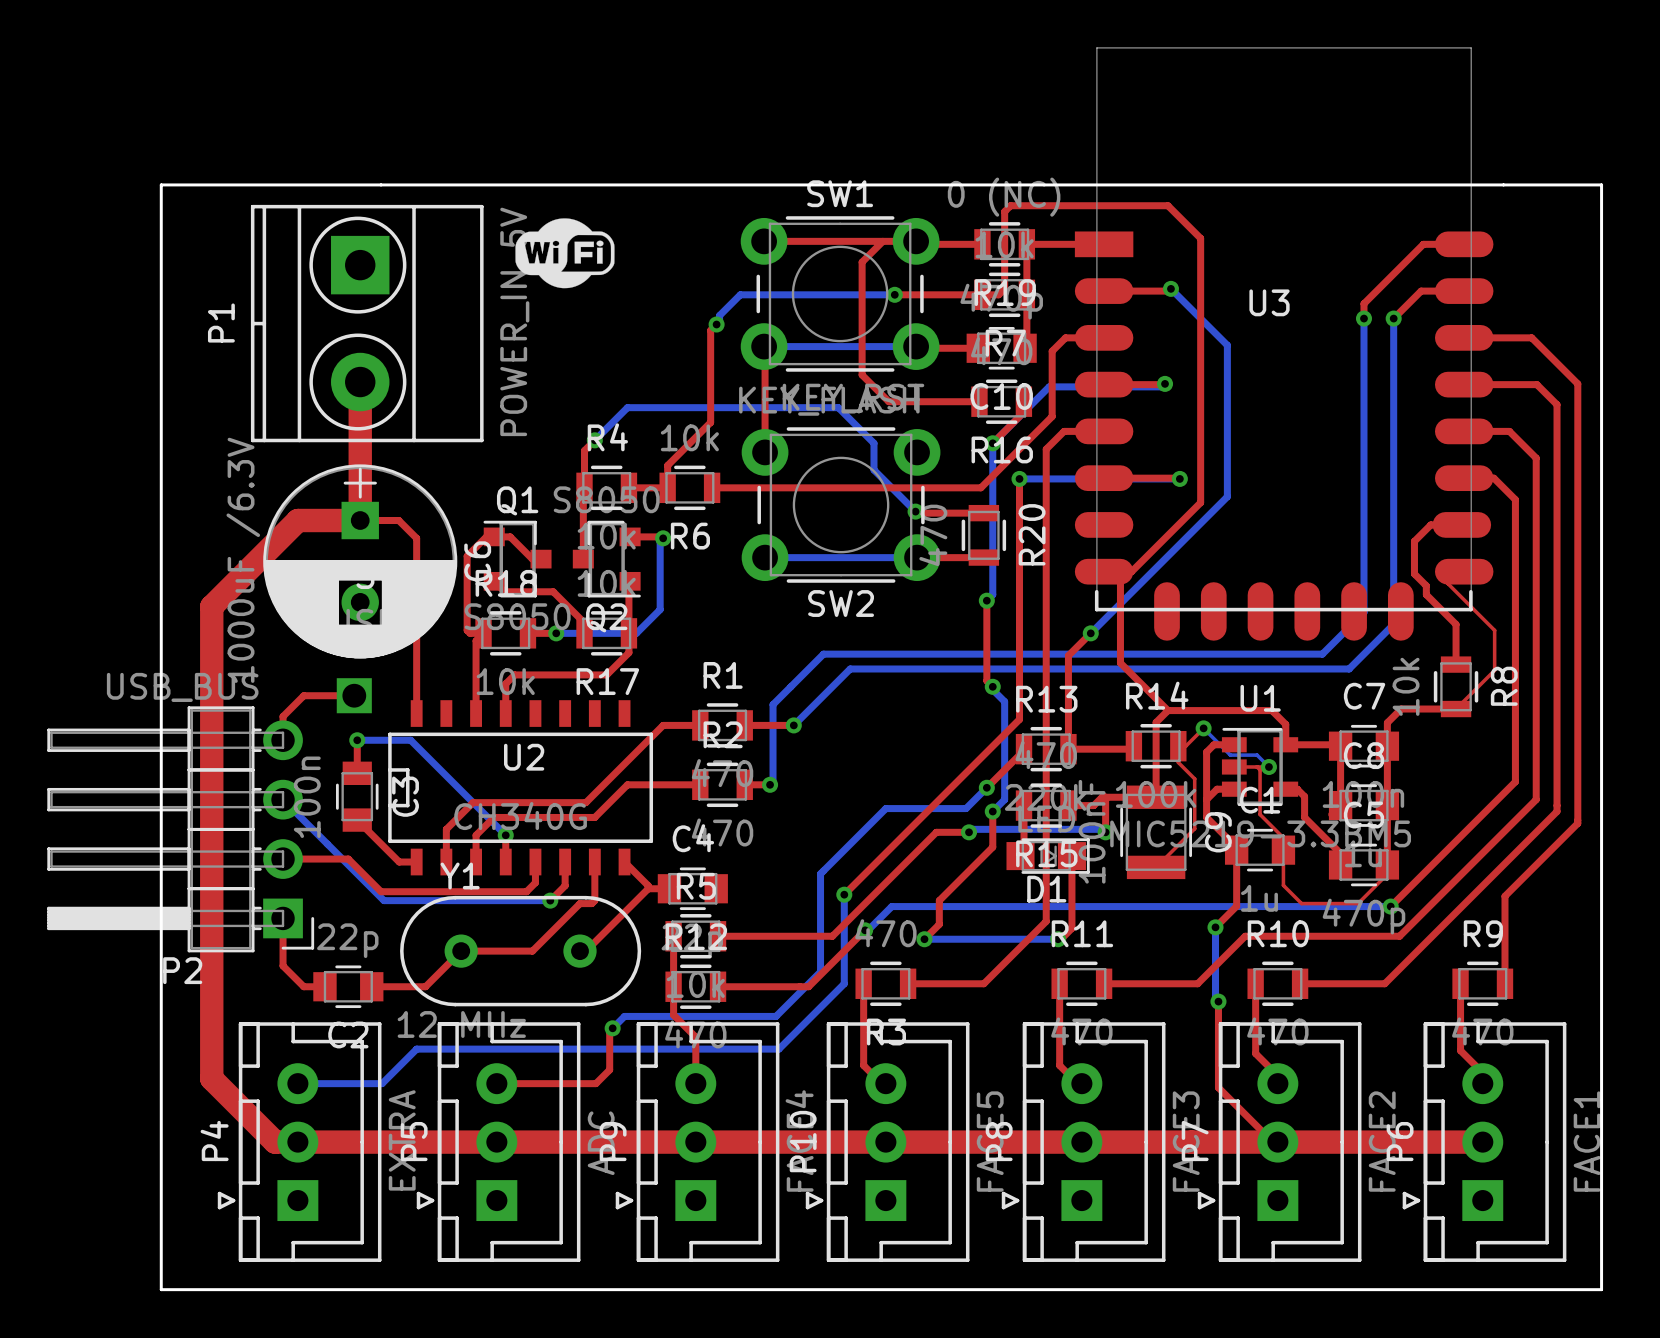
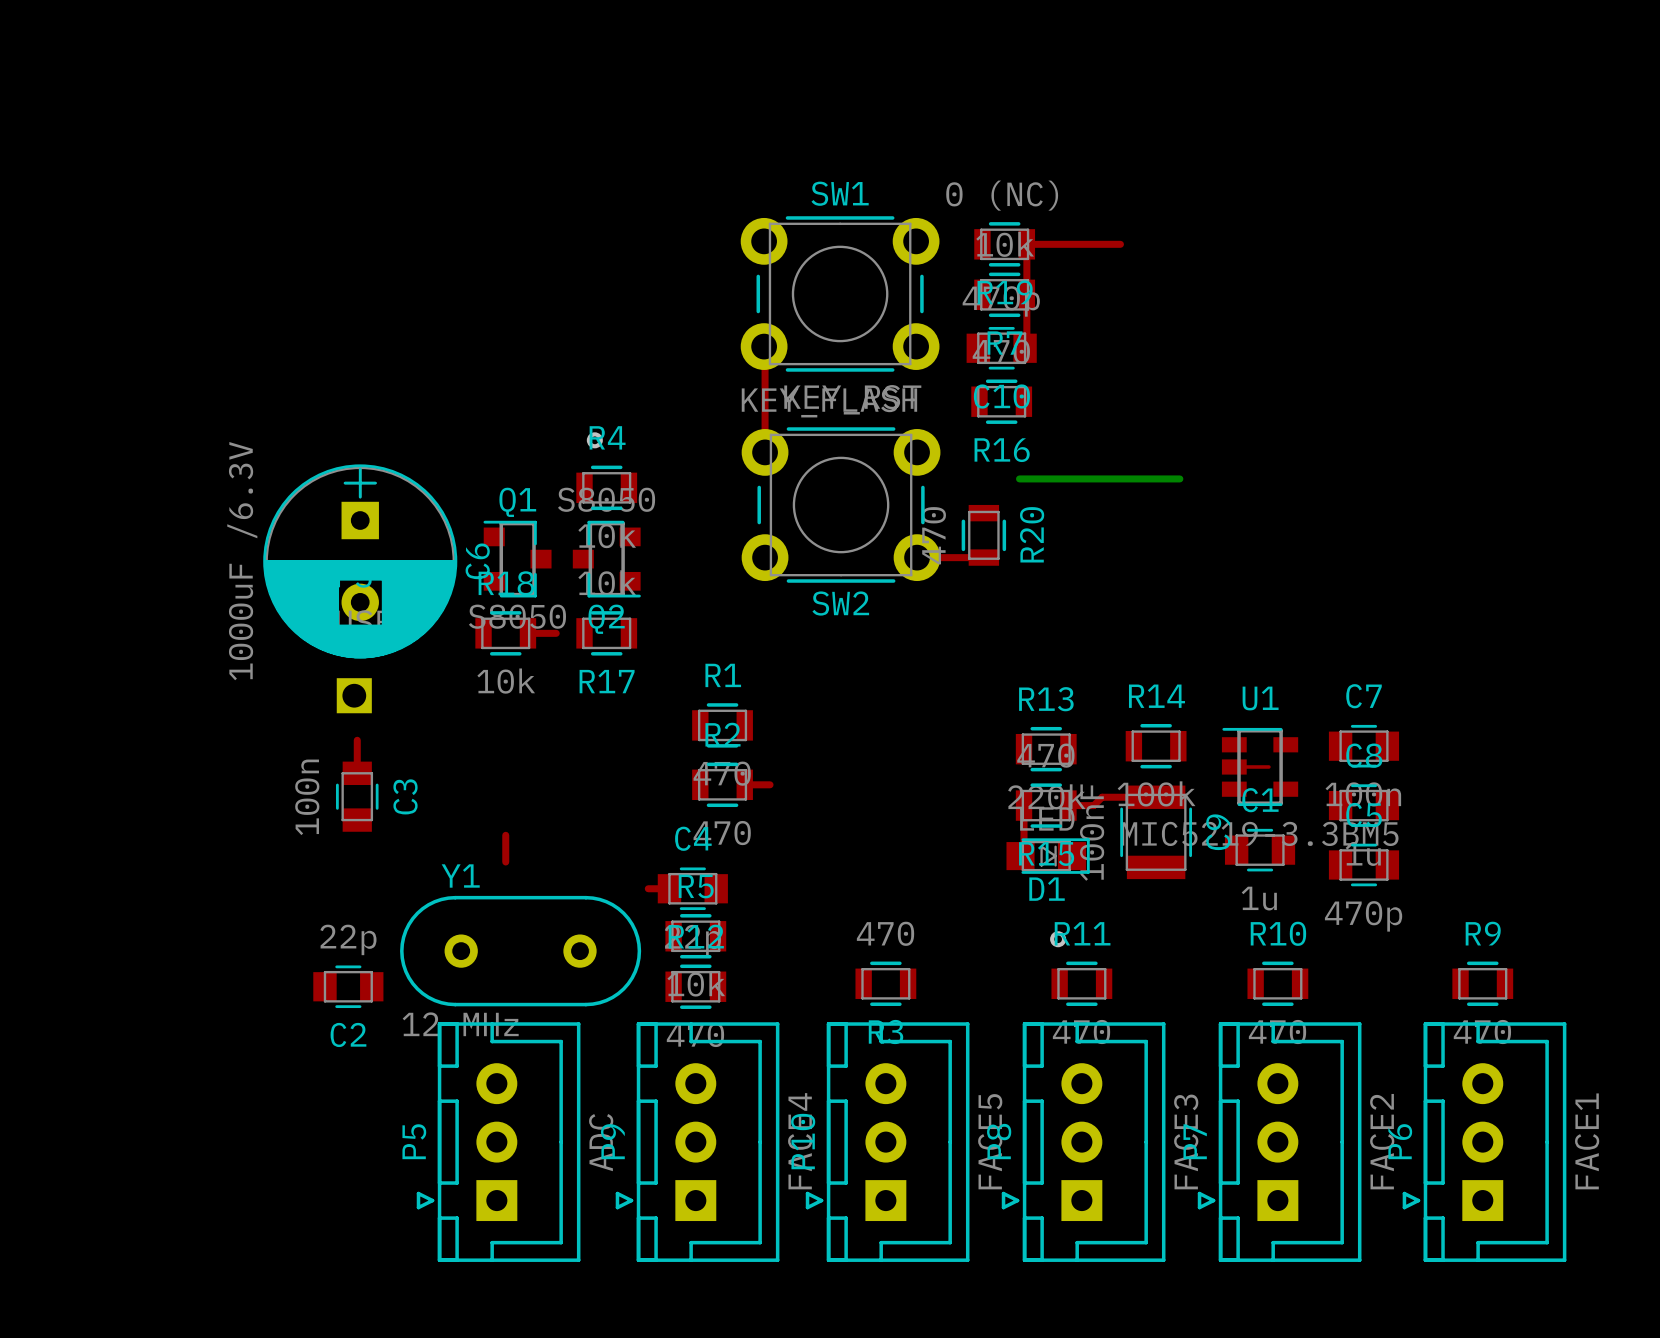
board edge: (161, 184) (1601, 184) (1601, 1289) (161, 1289) (161, 184) -> none
drawing: [515, 218, 615, 289] -> none
top track: (764, 241) (916, 241) (919, 244) (982, 244) -> none
top track: (882, 241) (862, 262) (862, 374) (888, 401) (979, 401) -> none
top track: (1447, 244) (1423, 244) (1363, 303) (1363, 318) -> none
top track: (1170, 288) (1171, 291) (1120, 291) -> none
bottom track: (1170, 288) (1227, 345) (1227, 496) (1090, 633) -> none
via: (1170, 288) -> none
top track: (1447, 291) (1421, 291) (1393, 318) -> none
top track: (894, 294) (998, 294) (1004, 288) (1004, 211) (1010, 205) (1167, 205) (1200, 238) (1200, 502) (1131, 571) (1120, 571) (1120, 663) (1167, 710) -> none
bottom track: (894, 294) (740, 294) (719, 315) (719, 321) (716, 324) -> none
via: (894, 294) -> none
bottom track: (1363, 318) (1363, 612) (1322, 654) (823, 654) (773, 704) (773, 784) (770, 784) -> none
via: (1363, 318) -> none
bottom track: (1393, 318) (1393, 624) (1349, 668) (850, 668) (793, 725) -> none
via: (1393, 318) -> none
P1: POWER_IN 5V (367, 323) -> none
top track: (716, 324) (710, 330) (710, 422) (667, 465) (667, 487) (628, 487) -> none
via: (716, 324) -> none
top track: (1120, 337) (1065, 337) (1052, 351) (1052, 416) (980, 487) (712, 487) -> none
top track: (1447, 337) (1531, 337) (1577, 383) (1577, 823) (1504, 896) (1504, 983) -> none
U3: (1284, 344) -> none
bottom track: (764, 346) (916, 346) -> none
top track: (916, 346) (917, 348) (978, 348) -> none
top track: (360, 382) (360, 520) -> none
top track: (1165, 383) (1120, 384) -> none
bottom track: (1165, 383) (1162, 386) (1049, 386) (992, 443) (992, 594) (986, 600) -> none
via: (1165, 383) -> none
top track: (1447, 384) (1536, 384) (1557, 404) (1557, 811) (1384, 983) (1300, 983) -> none
top track: (1023, 401) (1023, 412) (992, 443) -> none
top track: (1120, 431) (1064, 431) (1046, 449) (1046, 921) (983, 983) (908, 983) -> none
top track: (1447, 431) (1509, 431) (1536, 458) (1536, 799) (1399, 936) (1245, 936) (1197, 983) (1104, 983) -> none
top track: (594, 440) (584, 450) (583, 559) -> none
bottom track: (594, 440) (627, 407) (838, 407) (873, 443) (873, 470) (915, 511) -> none
via: (992, 443) -> none
top track: (1019, 478) (1019, 719) (844, 894) -> none
via: (1019, 478) -> none
top track: (1120, 478) (1179, 478) -> none
via: (1179, 478) -> none
top track: (1447, 478) (1493, 478) (1515, 499) (1515, 781) (1390, 906) -> none
R6: 10k (689, 487) -> none
top track: (915, 511) (917, 513) (983, 513) -> none
via: (915, 511) -> none
top track: (360, 520) (398, 520) (416, 538) (416, 713) -> none
top track: (360, 520) (297, 520) (211, 606) (211, 1078) (275, 1142) (1482, 1142) -> none
top track: (1447, 524) (1430, 524) (1414, 541) (1414, 573) (1426, 585) (1426, 594) (1456, 624) (1456, 664) -> none
top track: (630, 536) (663, 538) -> none
bottom track: (663, 538) (660, 541) (660, 609) (636, 633) (556, 633) -> none
via: (663, 538) -> none
bottom track: (765, 557) (917, 557) -> none
top track: (541, 559) (532, 559) (510, 536) (486, 536) (467, 556) (467, 630) (470, 633) (483, 633) (476, 640) (476, 713) -> none
top track: (1447, 571) (1447, 583) (1494, 630) (1494, 670) (1456, 709) (1401, 709) (1387, 722) (1387, 874) (1358, 903) (1301, 903) (1283, 885) (1283, 837) (1260, 814) (1260, 769) (1257, 766) -> none
top track: (494, 581) (504, 591) (553, 591) (584, 623) (584, 633) -> none
top track: (630, 581) (628, 652) (606, 674) (514, 674) (505, 683) (505, 713) -> none
top track: (986, 600) (986, 680) (992, 686) -> none
via: (986, 600) -> none
via: (556, 633) -> none
top track: (1090, 633) (1068, 655) (1068, 749) (1130, 749) (1133, 746) -> none
via: (1090, 633) -> none
bottom track: (992, 686) (992, 689) (1004, 701) (1004, 799) (992, 811) -> none
via: (992, 686) -> none
R8: 10k (1456, 686) -> none
top track: (354, 695) (303, 695) (283, 716) (283, 740) -> none
top track: (1167, 710) (1271, 710) (1285, 724) (1285, 744) (1339, 744) (1340, 805) (1331, 814) -> none
top track: (1167, 710) (1156, 722) (1156, 797) (1159, 794) -> none
top track: (700, 725) (663, 725) (585, 802) (473, 802) (446, 829) (446, 862) -> none
top track: (744, 725) (793, 725) -> none
via: (793, 725) -> none
top track: (1203, 728) (1185, 746) (1178, 746) (1178, 762) (1194, 778) (1194, 828) (1156, 867) -> none
bottom track: (1203, 728) (1230, 755) (1257, 755) (1268, 766) -> none
via: (1203, 728) -> none
bottom track: (357, 740) (410, 740) (505, 835) -> none
via: (357, 740) -> none
top track: (1234, 744) (1213, 744) (1206, 752) (1206, 817) (1236, 847) (1236, 906) (1215, 927) -> none
top track: (1024, 749) (986, 787) -> none
via: (1268, 766) -> none
top track: (700, 784) (627, 784) (594, 817) (493, 817) (476, 835) (476, 862) -> none
via: (770, 784) -> none
U2: CH340G (520, 787) -> none
bottom track: (986, 787) (966, 808) (885, 808) (820, 873) (820, 971) (775, 1016) (624, 1016) (612, 1028) -> none
via: (986, 787) -> none
top track: (1234, 789) (1217, 789) (1206, 799) -> none
top track: (1285, 789) (1297, 789) (1304, 796) (1304, 817) (1340, 853) (1340, 864) -> none
top track: (1105, 797) (1105, 832) -> none
bottom track: (283, 799) (383, 900) (550, 900) -> none
top track: (992, 811) (992, 847) (939, 900) (939, 924) (924, 939) -> none
via: (992, 811) -> none
top track: (357, 820) (399, 862) (416, 862) -> none
P2: USB_BUS (180, 829) -> none
top track: (969, 832) (936, 832) (832, 936) (718, 936) -> none
bottom track: (969, 832) (971, 829) (1102, 829) (1105, 832) -> none
via: (969, 832) -> none
via: (1105, 832) -> none
via: (505, 835) -> none
top track: (1071, 856) (1071, 928) (1061, 939) (1058, 939) -> none
top track: (283, 859) (348, 859) (381, 891) (526, 891) (535, 882) (535, 862) -> none
top track: (565, 862) (565, 885) (550, 900) -> none
top track: (594, 862) (594, 900) (591, 903) (579, 903) (532, 951) (461, 951) (425, 986) (371, 986) -> none
top track: (624, 862) (648, 885) (648, 888) (585, 951) (579, 951) -> none
bottom track: (844, 894) (844, 983) (778, 1049) (416, 1049) (382, 1083) (297, 1083) -> none
via: (844, 894) -> none
via: (550, 900) -> none
bottom track: (1390, 906) (891, 906) (868, 930) (865, 930) -> none
via: (1390, 906) -> none
top track: (283, 918) (283, 965) (303, 986) (324, 986) -> none
bottom track: (1215, 927) (1215, 998) (1218, 1001) -> none
via: (1215, 927) -> none
top track: (865, 930) (808, 986) (718, 986) -> none
via: (865, 930) -> none
top track: (673, 936) (673, 1015) (695, 1037) (695, 1083) -> none
bottom track: (924, 939) (1058, 939) -> none
via: (924, 939) -> none
top track: (863, 983) (863, 1065) (881, 1083) (885, 1083) -> none
top track: (1059, 983) (1059, 1065) (1077, 1083) (1081, 1083) -> none
top track: (1255, 983) (1255, 1053) (1277, 1075) (1277, 1083) -> none
top track: (1460, 983) (1460, 1050) (1482, 1072) (1482, 1083) -> none
top track: (1218, 1001) (1218, 1087) (1272, 1142) (1277, 1142) -> none
via: (1218, 1001) -> none
top track: (612, 1028) (609, 1031) (609, 1069) (595, 1083) (496, 1083) -> none
via: (612, 1028) -> none
P4: EXTRA (299, 1142) -> none

